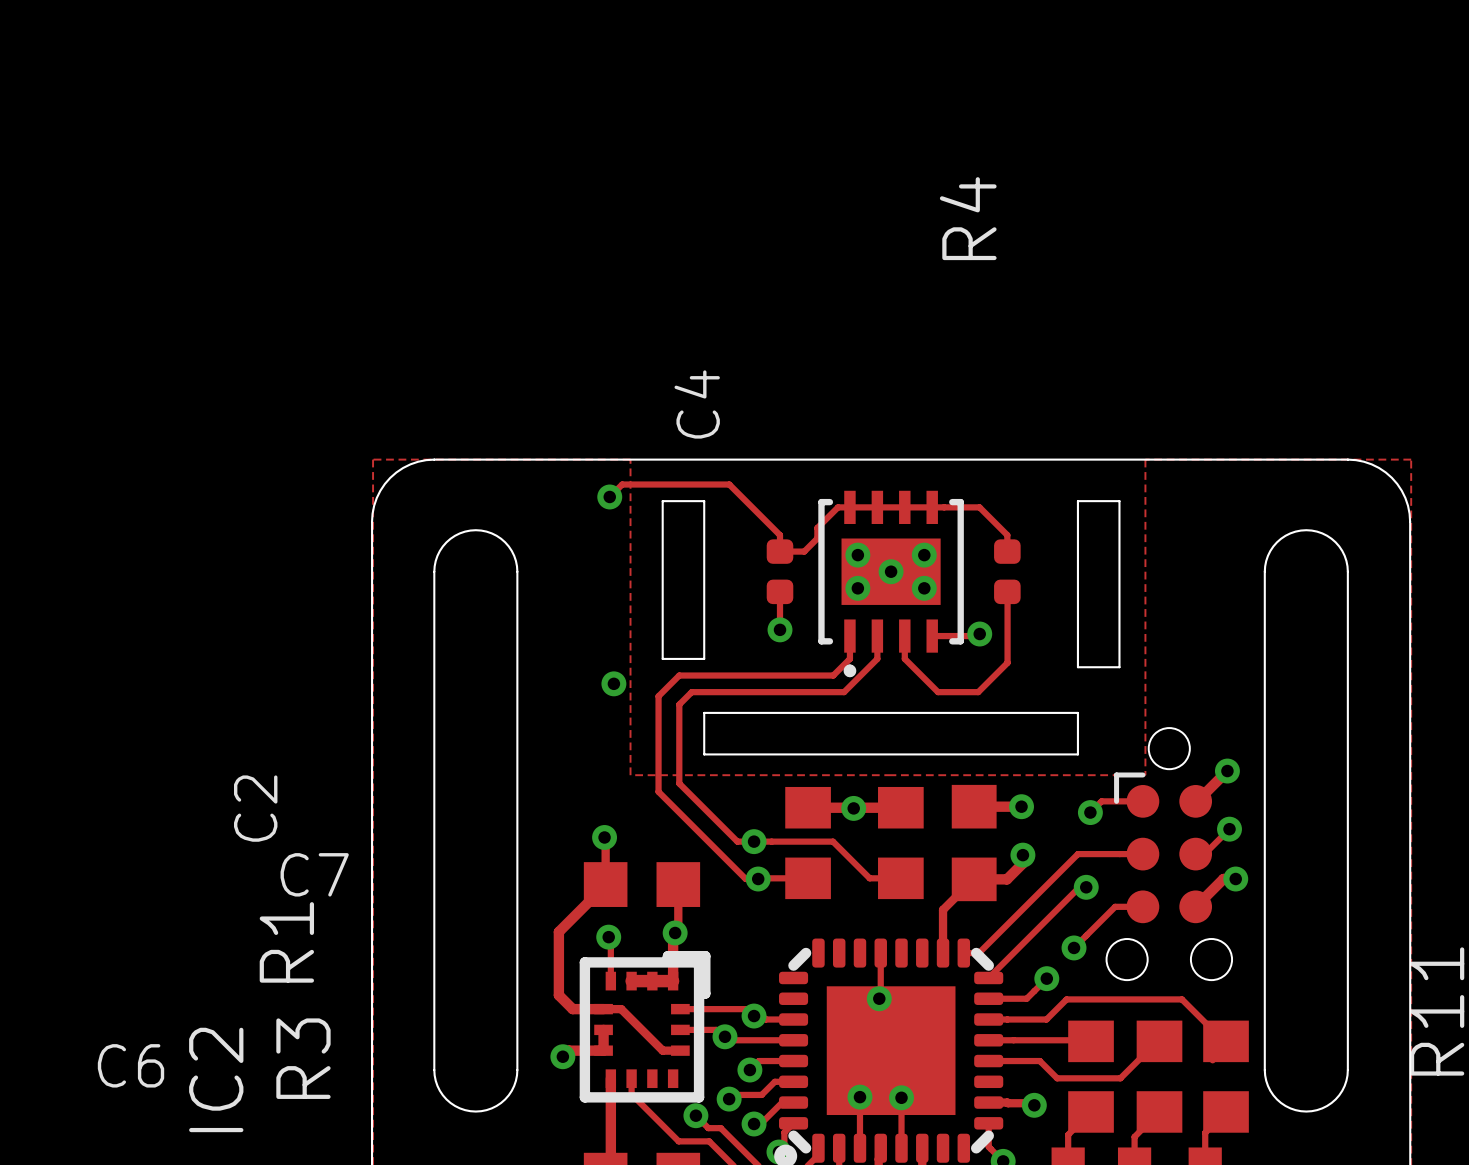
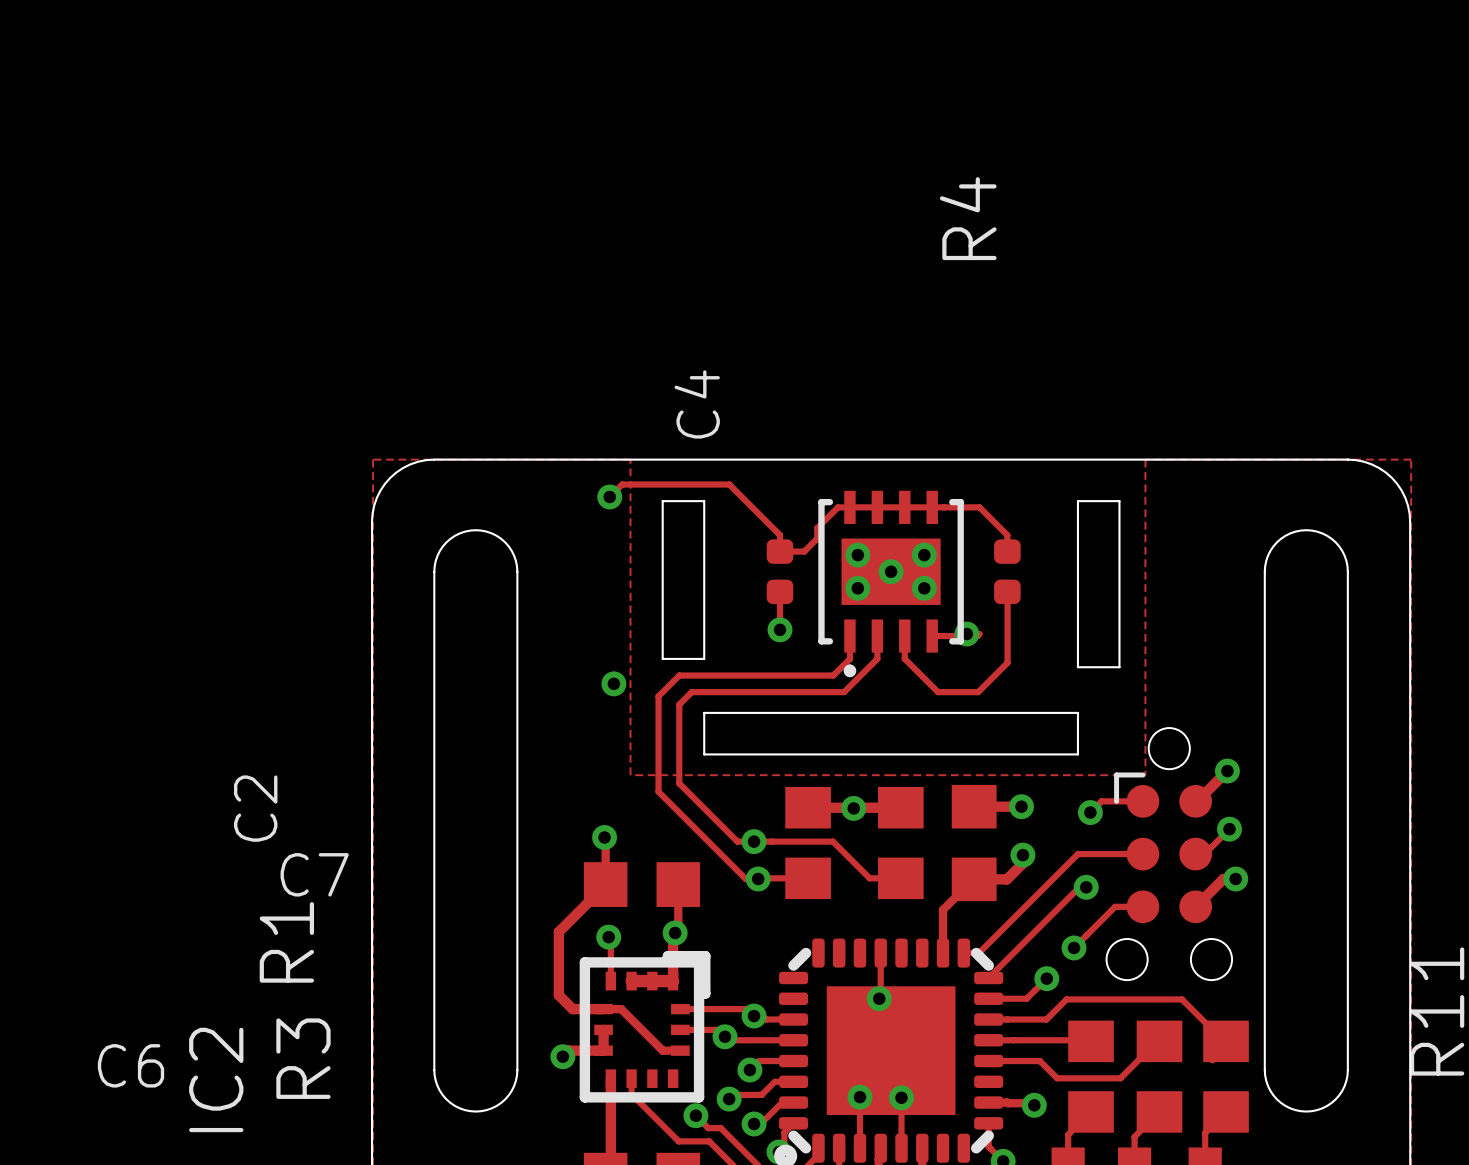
via position: (979, 634) -> (966, 634)

